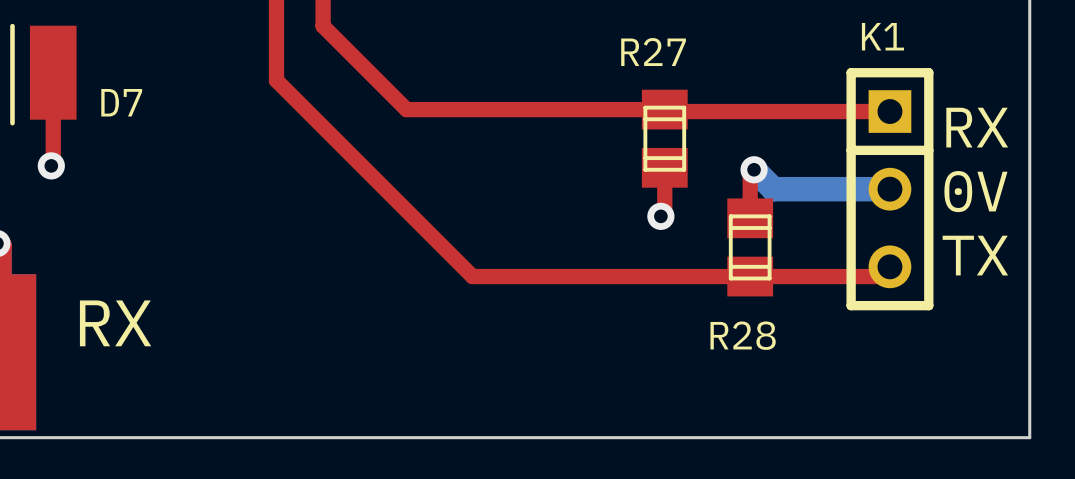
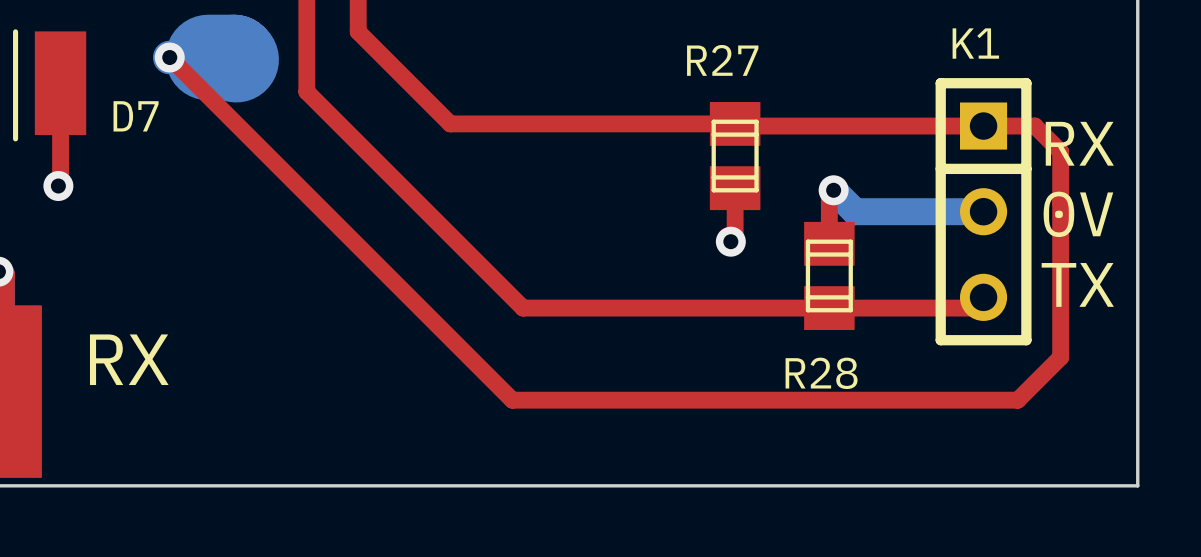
top track: none -> (169, 57) (512, 400) (1017, 400) (1060, 357) (1060, 151) (1034, 126) (983, 126)
bottom track: none -> (169, 57) (234, 57) (236, 59)
via: none -> (169, 57)

